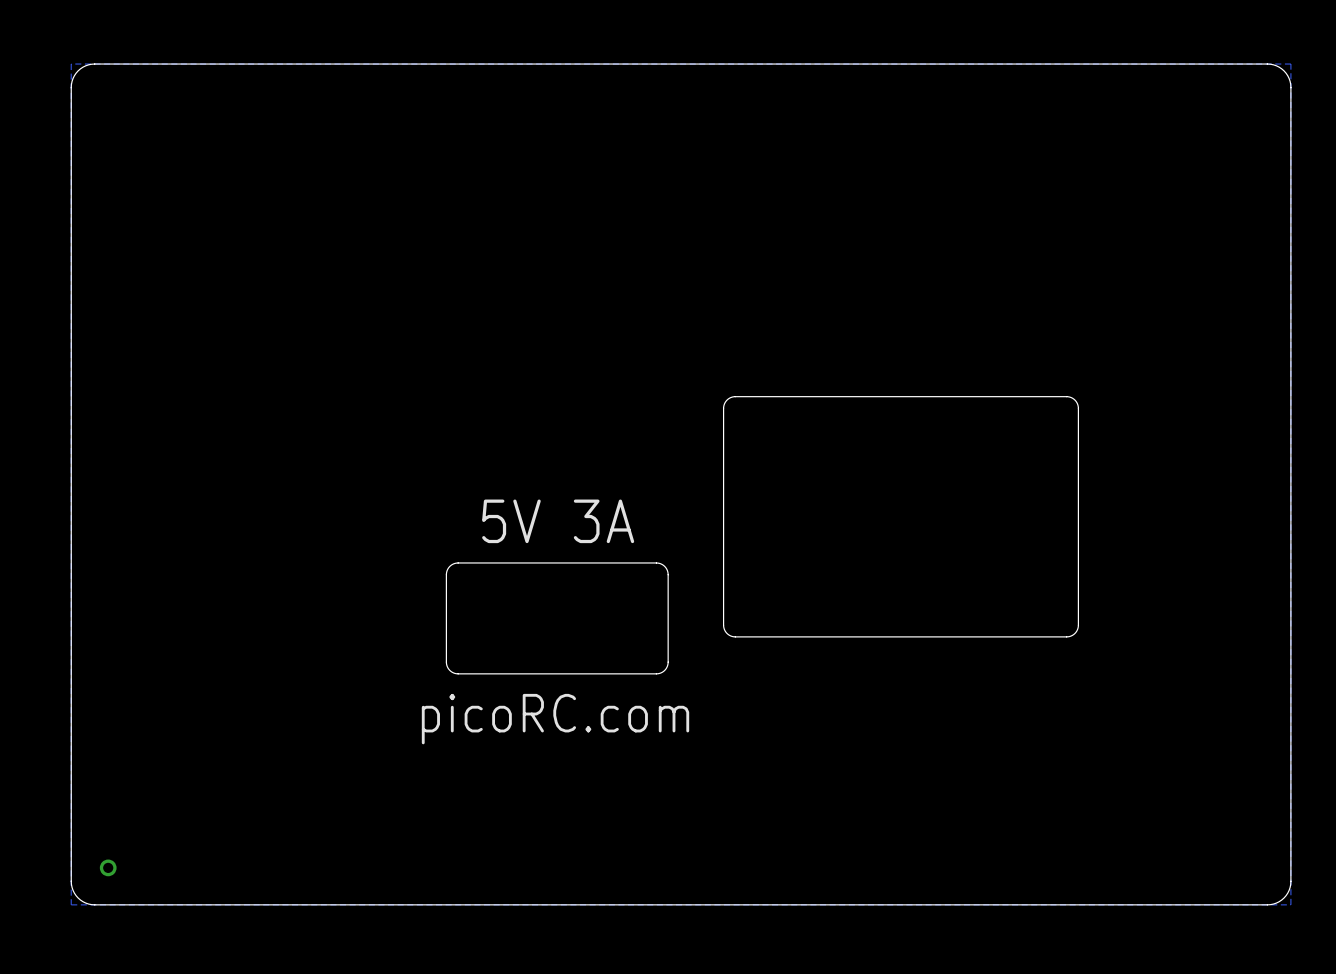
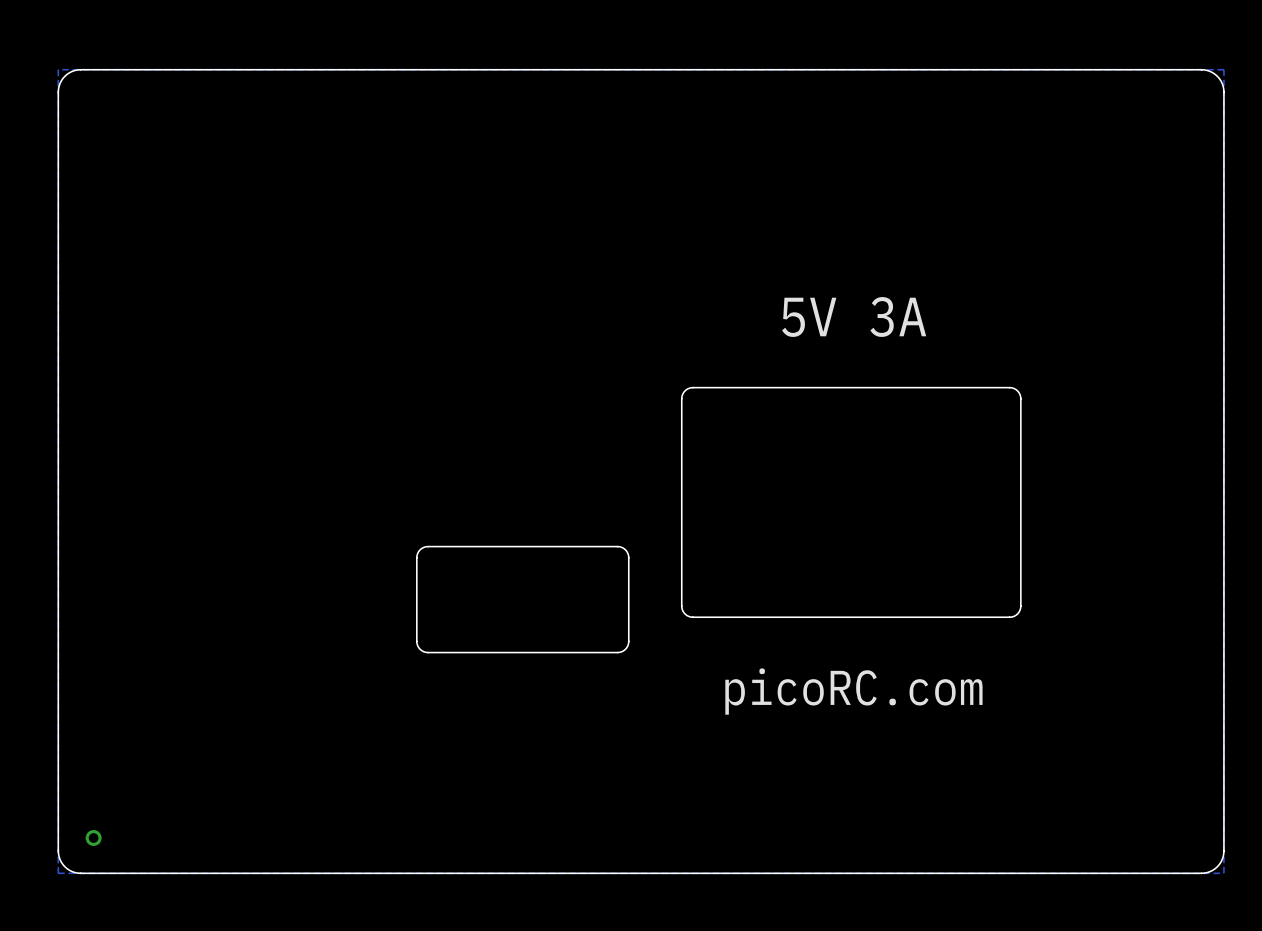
text position: 5V 3A (558, 521) -> 5V 3A (854, 316)
text position: picoRC.com (555, 719) -> picoRC.com (853, 691)

